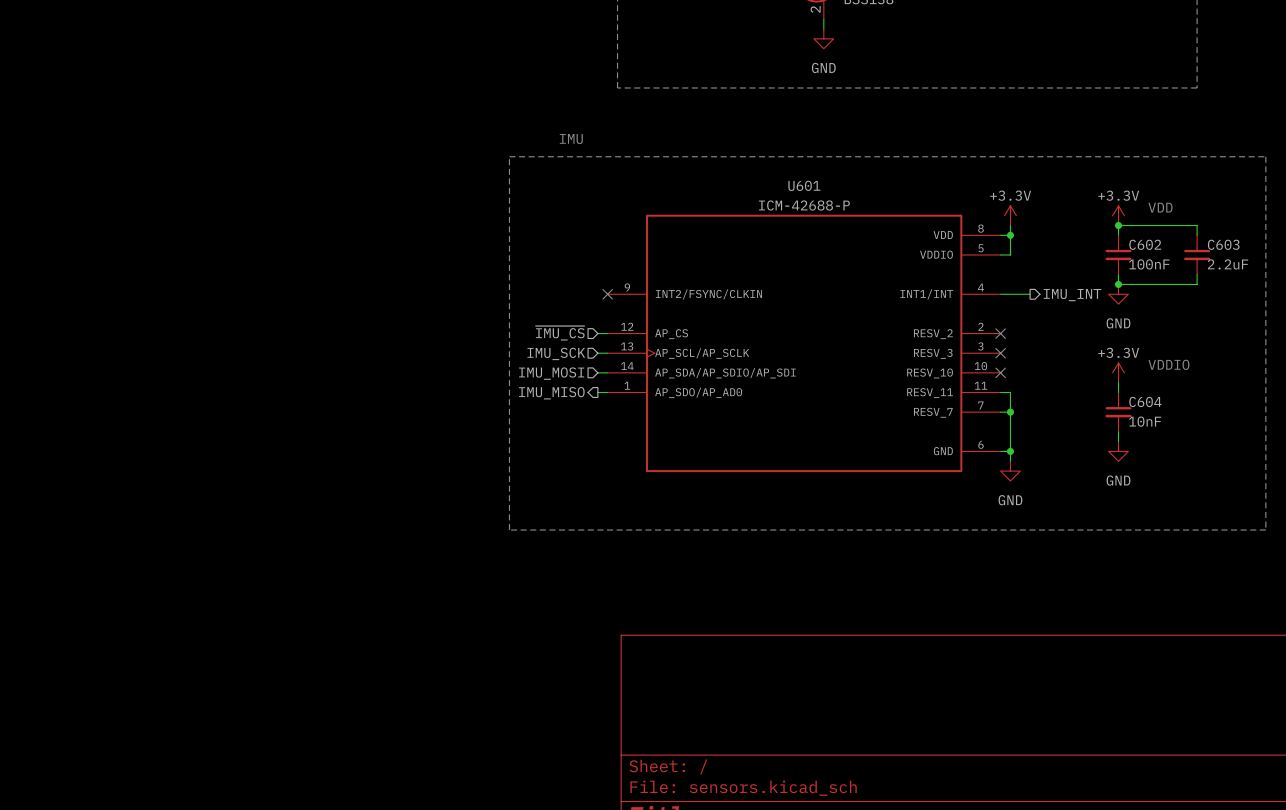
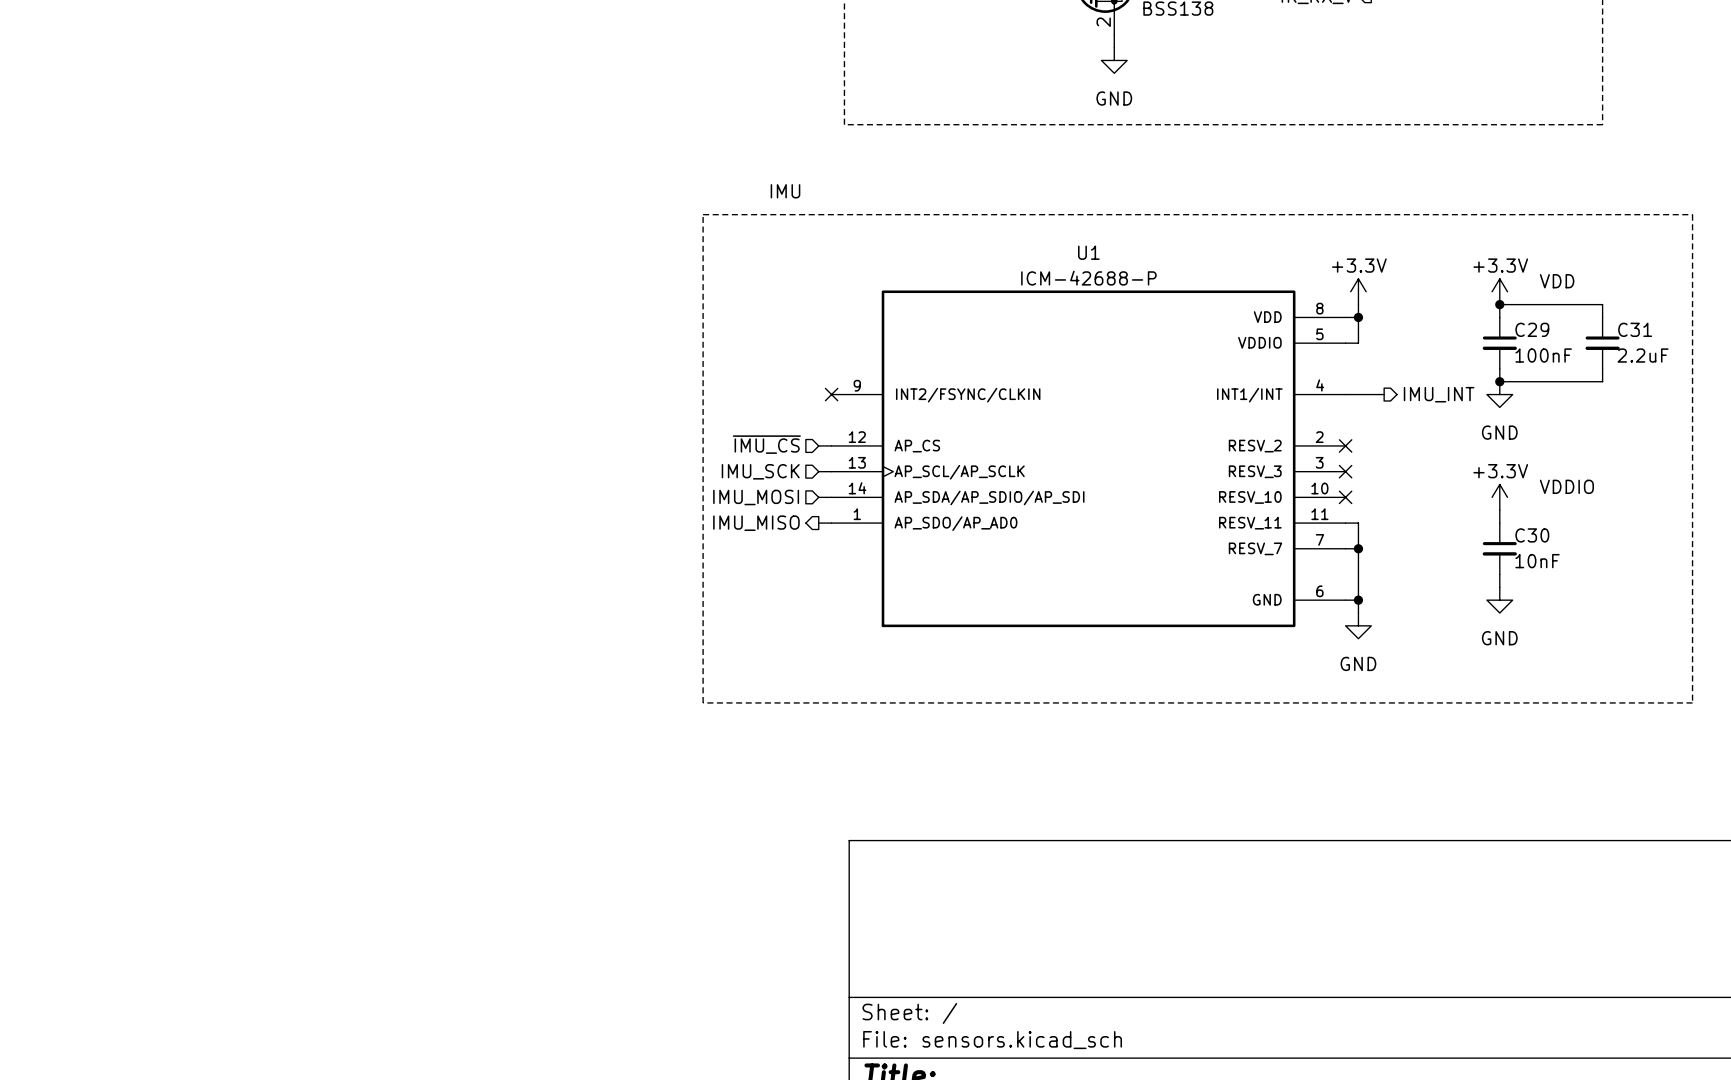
U601 name: U601 (804, 185) -> U1 (1088, 252)
C602 name: C602 (1145, 244) -> C29 (1532, 329)
C603 name: C603 (1223, 244) -> C31 (1635, 329)
C604 name: C604 (1145, 401) -> C30 (1532, 535)

